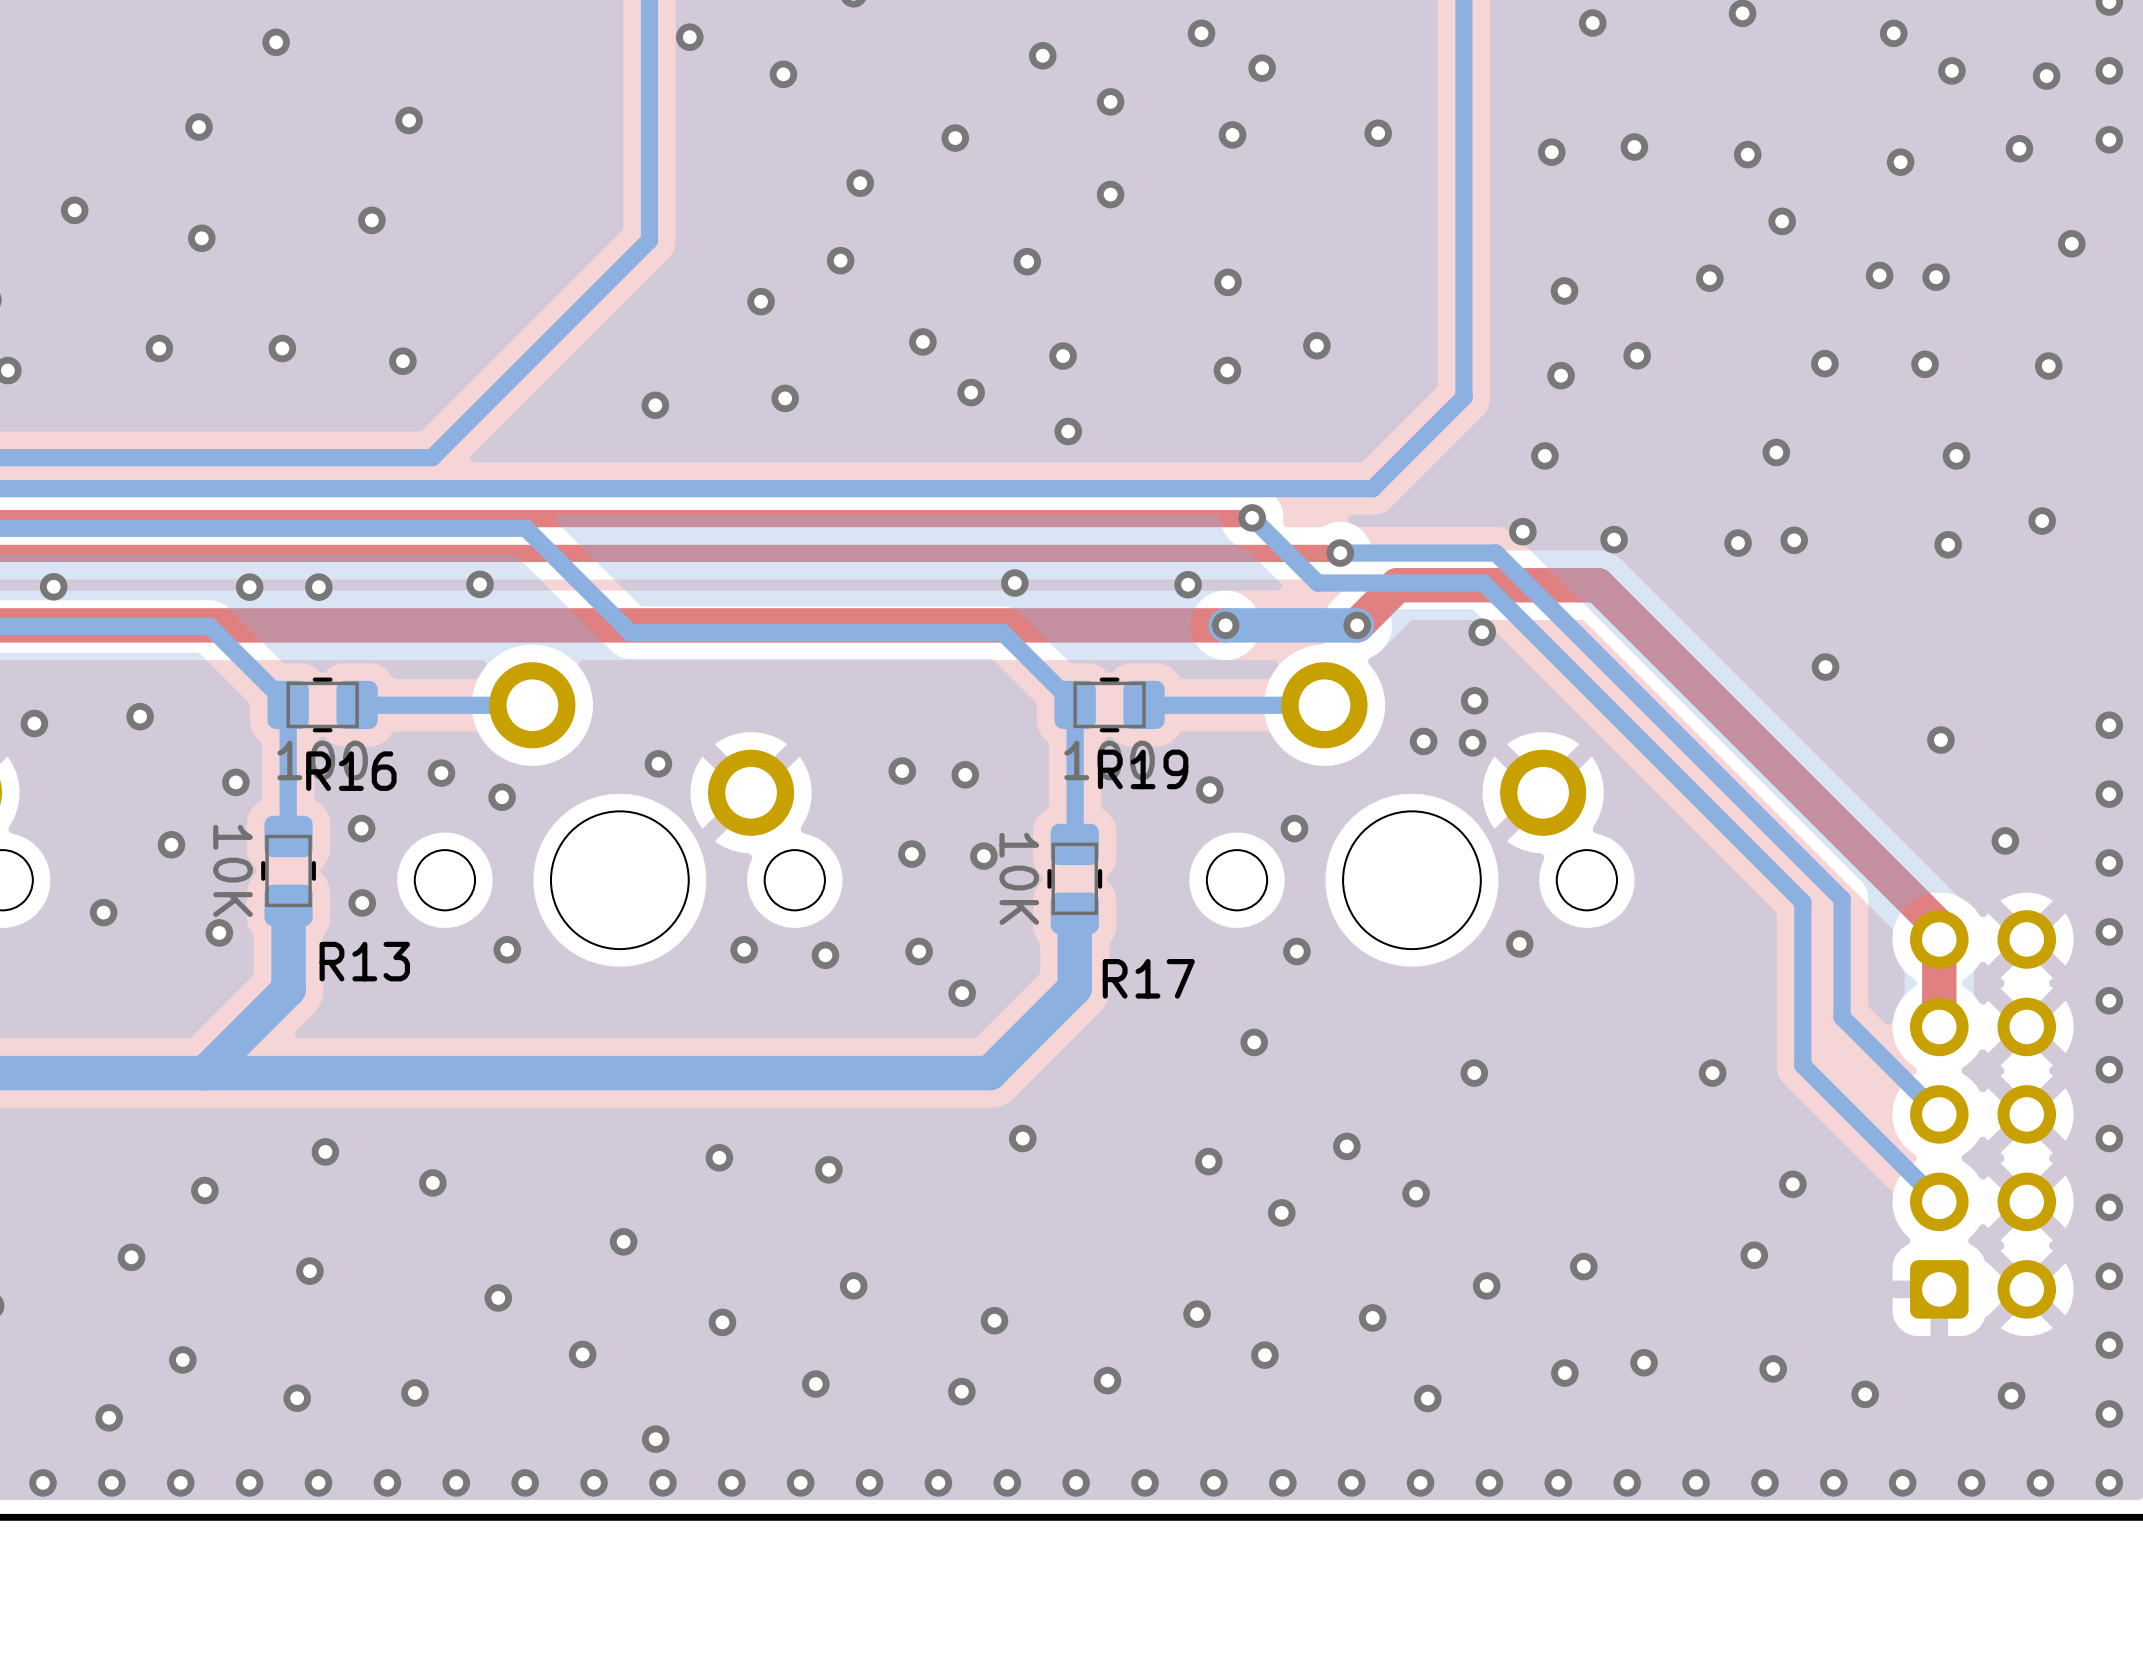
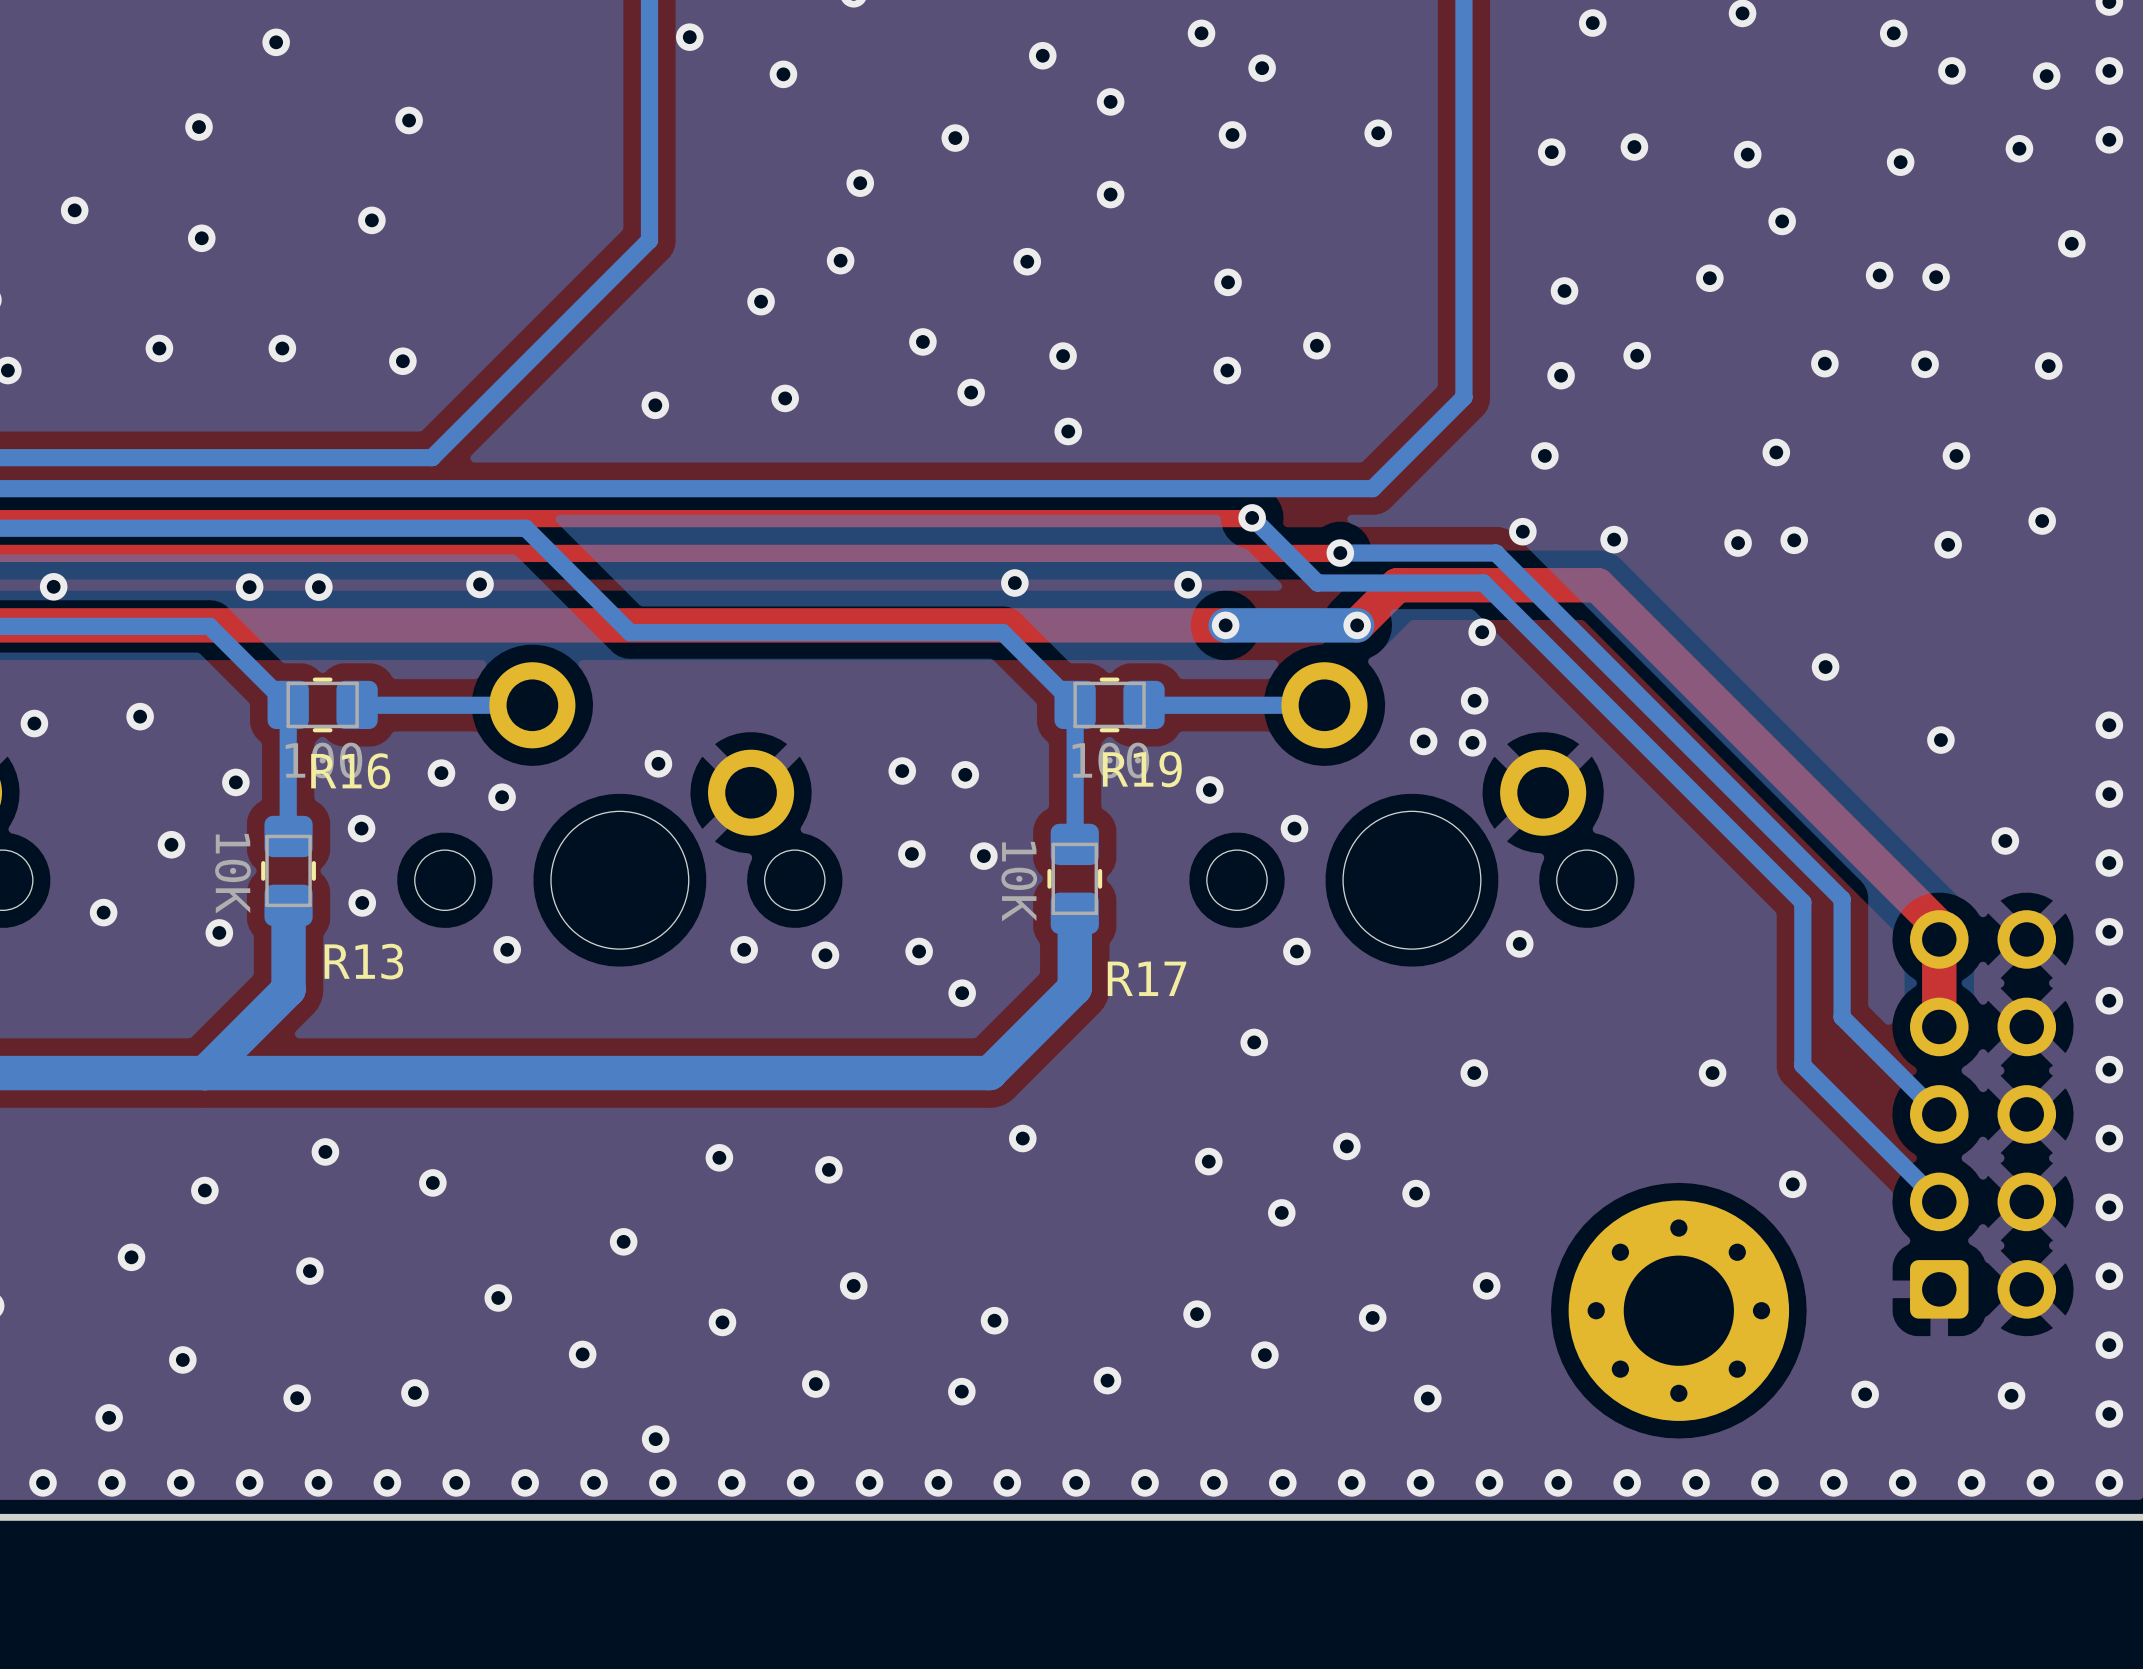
via: (1754, 1255) -> none
via: (1583, 1266) -> none
part: none -> (1678, 1310)
via: (1644, 1362) -> none
via: (1773, 1368) -> none
via: (1564, 1373) -> none

